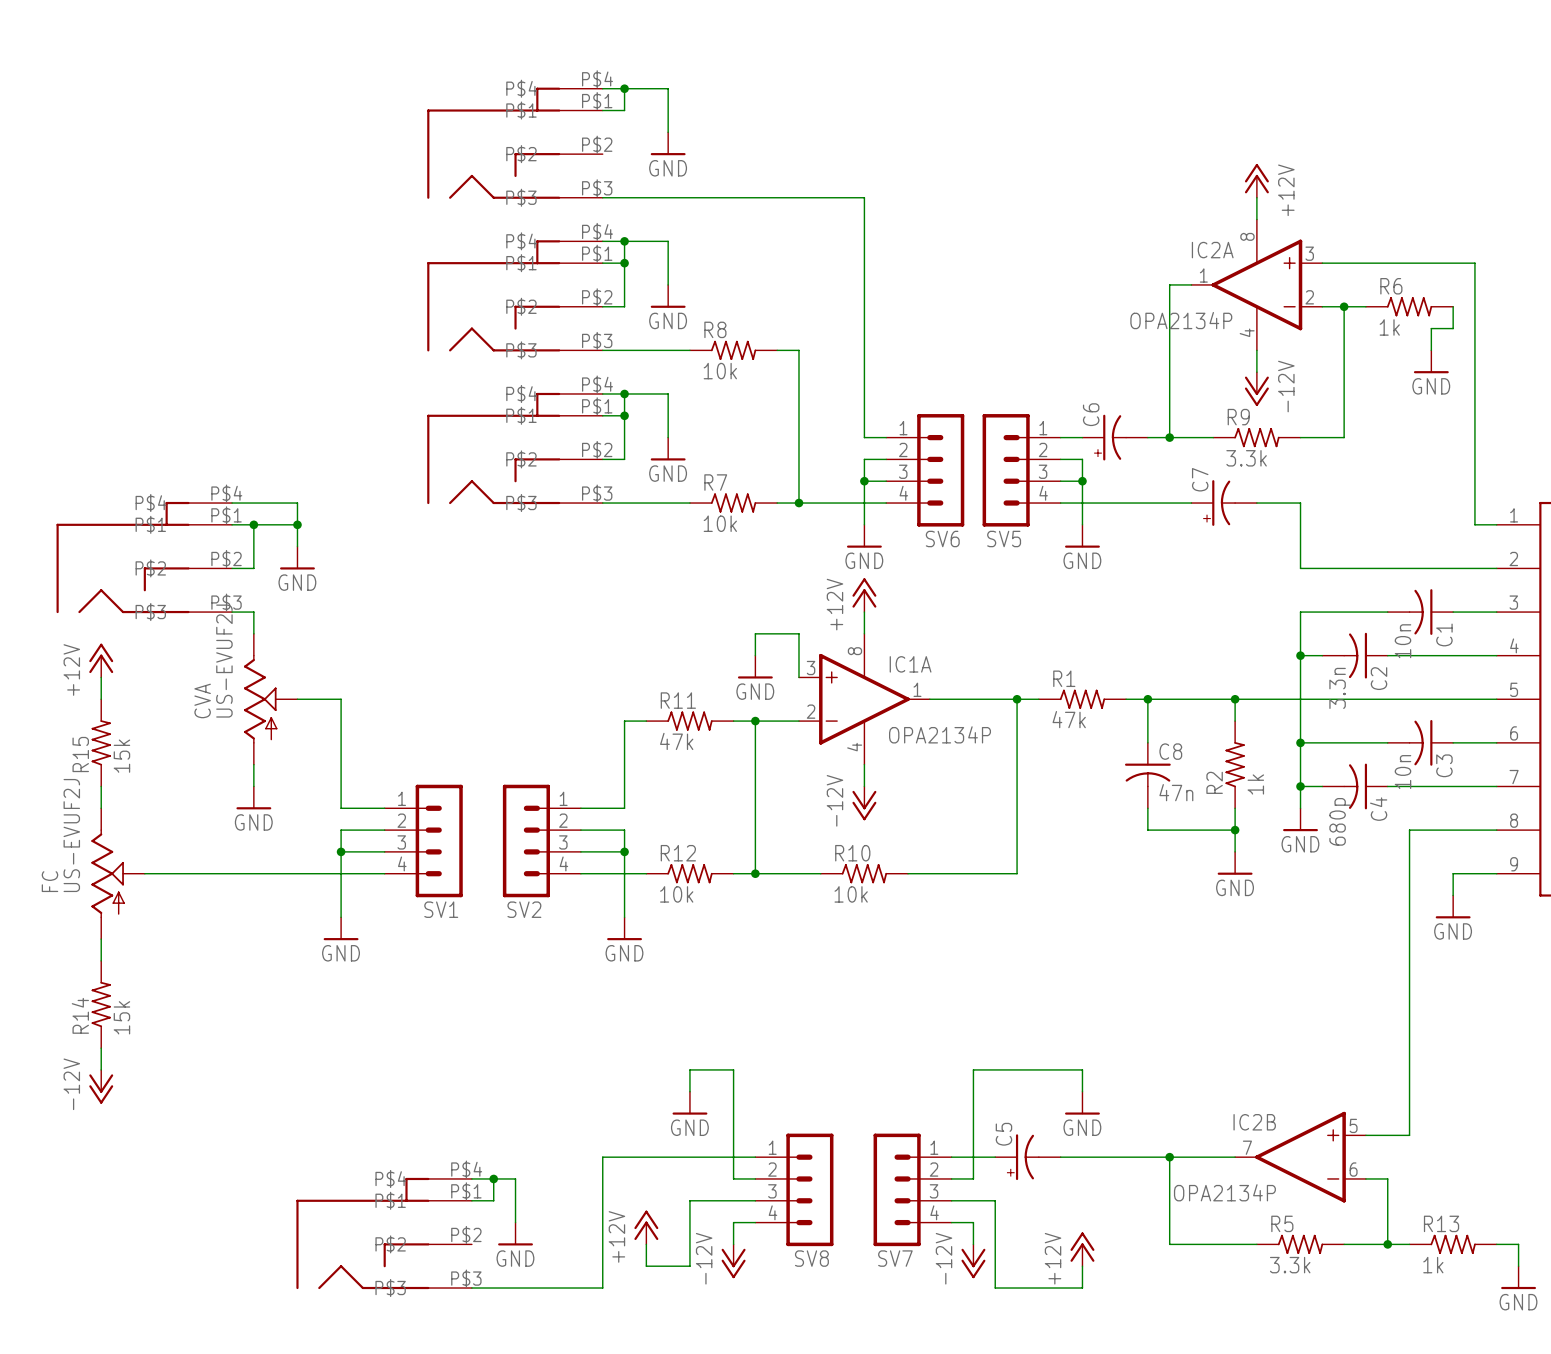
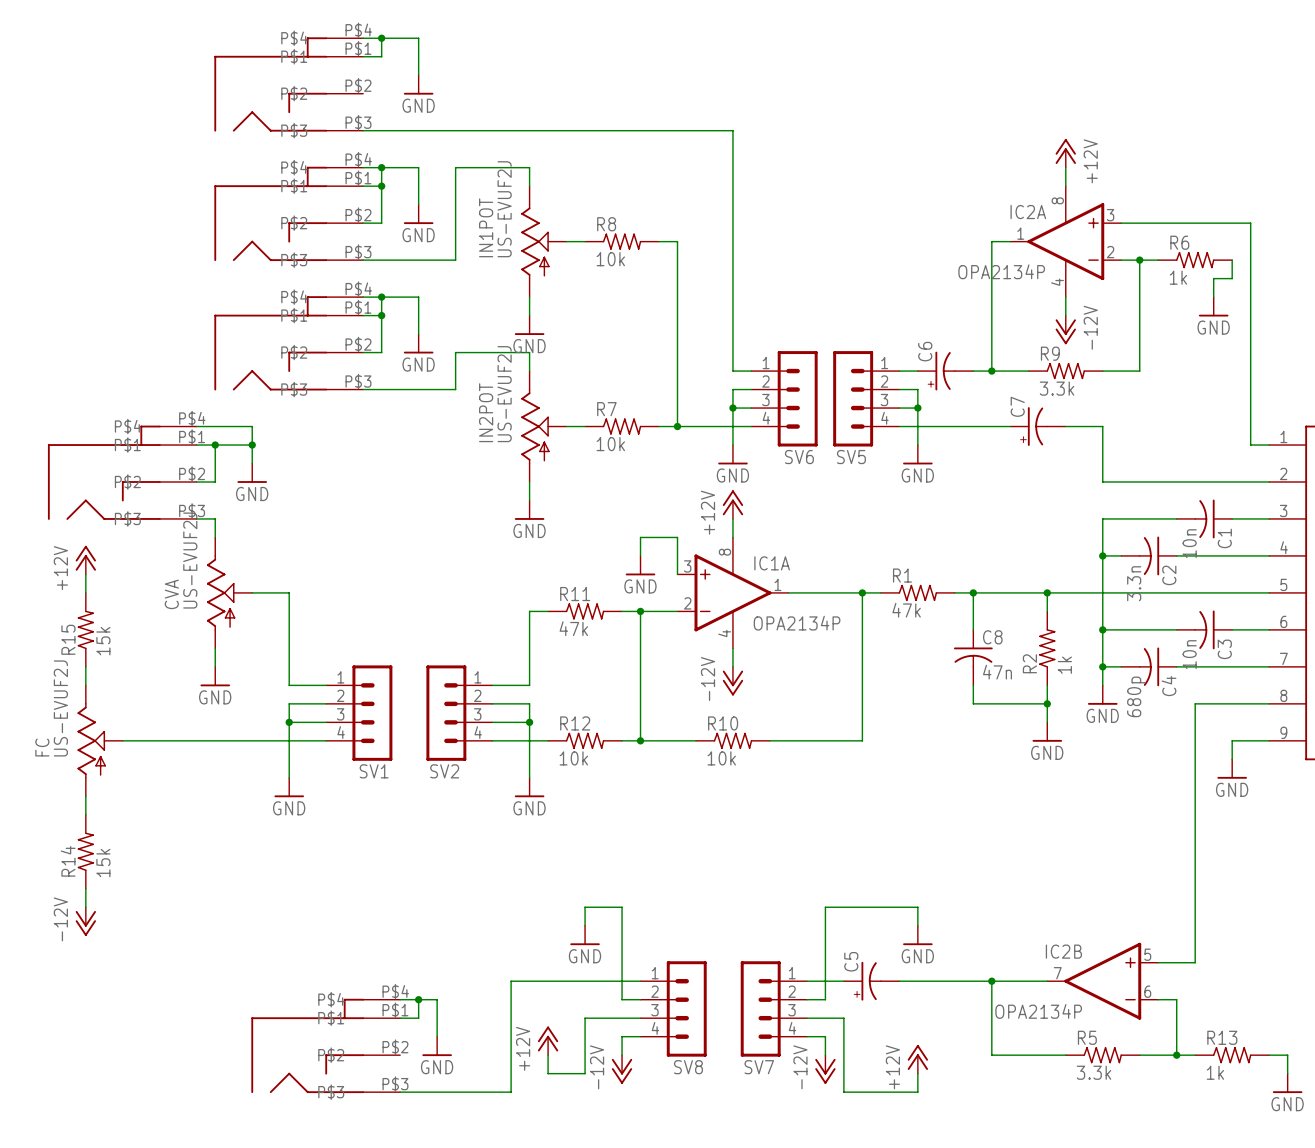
junction: none -> (381, 38)
wire: (602, 88) (668, 88) (668, 132) -> (363, 38) (418, 38) (418, 75)
wire: (624, 88) (624, 110) (602, 110) -> (381, 38) (381, 56) (363, 56)
junction: (624, 88) -> none
part: none -> (288, 84)
power symbol: none -> GND (418, 84)
part: (514, 143) -> none
power symbol: GND (668, 143) -> none
wire: none -> (363, 167) (418, 167) (418, 204)
junction: none -> (381, 167)
wire: none -> (511, 167) (455, 167) (455, 260) (363, 260)
wire: (624, 197) (864, 197) -> (363, 130) (732, 130) (732, 167)
wire: none -> (529, 167) (529, 186)
junction: none -> (381, 186)
wire: (602, 241) (668, 241) (668, 284) -> (585, 241) (566, 241)
wire: (624, 241) (624, 306) (602, 306) -> (381, 167) (381, 223) (363, 223)
junction: (624, 241) -> none
part: none -> (288, 213)
power symbol: none -> GND (418, 214)
wire: (602, 263) (624, 263) -> (363, 186) (381, 186)
junction: (624, 263) -> none
IN1POT: none -> US-EVUF2J (543, 241)
part: (514, 295) -> none
power symbol: GND (668, 296) -> none
wire: none -> (381, 297) (381, 352) (363, 352)
junction: none -> (381, 297)
wire: (602, 350) (689, 350) -> none
R8 position: (733, 350) -> (622, 241)
wire: (777, 350) (798, 350) -> (659, 241) (677, 241) (677, 297)
wire: none -> (363, 315) (381, 315)
junction: none -> (381, 315)
power symbol: none -> GND (529, 325)
wire: (602, 393) (668, 393) (668, 437) -> (363, 297) (418, 297) (418, 334)
wire: (624, 393) (624, 415) -> (529, 297) (529, 315)
junction: (624, 393) -> none
part: none -> (288, 343)
power symbol: none -> GND (418, 343)
wire: none -> (511, 352) (455, 352) (455, 389) (363, 389)
junction: (624, 415) -> none
wire: (624, 437) (624, 459) (602, 459) -> none
part: (514, 448) -> none
power symbol: GND (668, 449) -> none
wire: (602, 503) (668, 503) -> none
IN2POT: none -> US-EVUF2J (543, 426)
wire: none -> (529, 481) (529, 500)
power symbol: none -> GND (529, 510)

